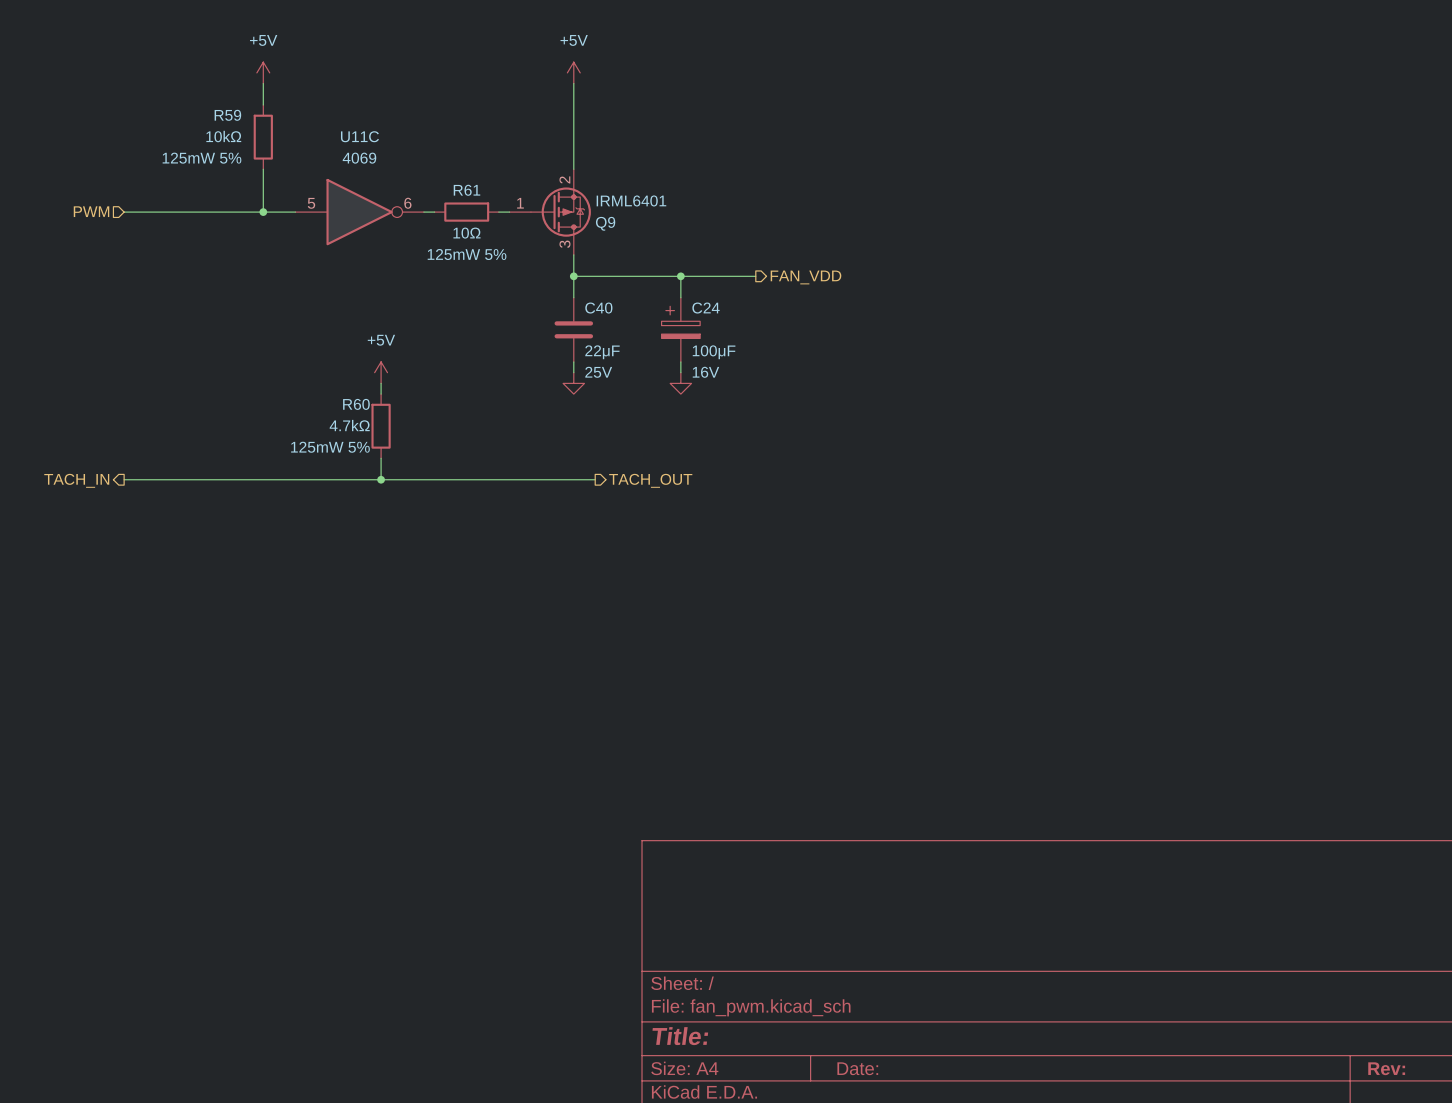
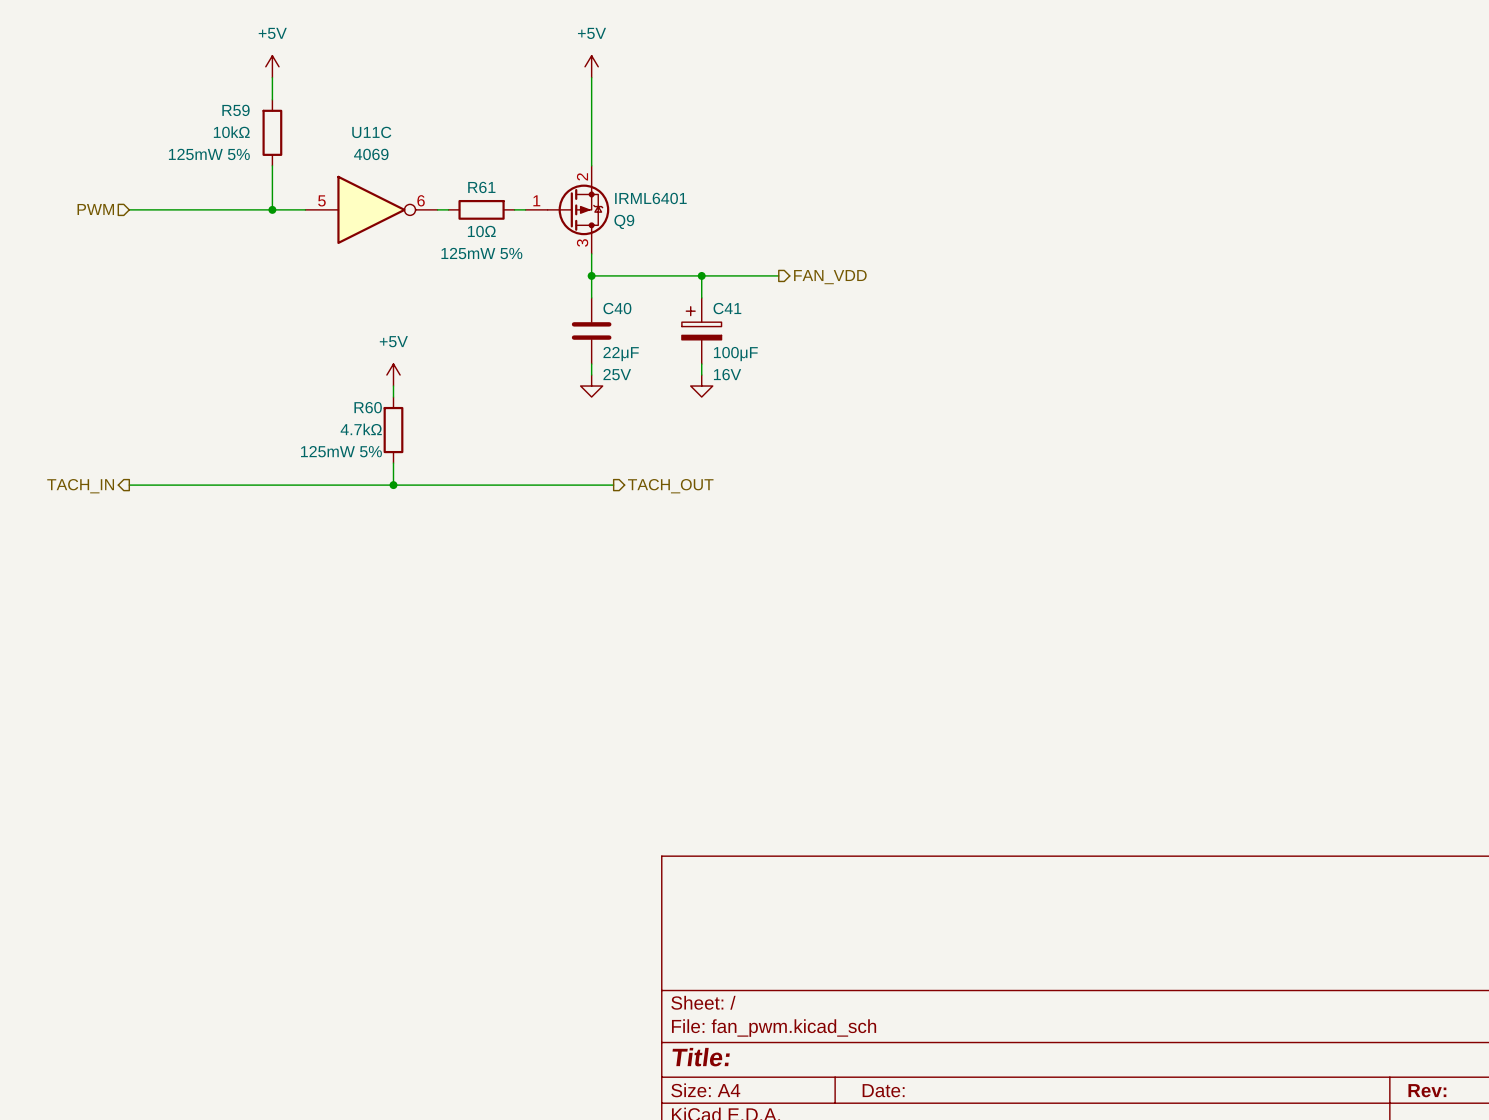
C24 name: C24 (706, 308) -> C41 (727, 308)

